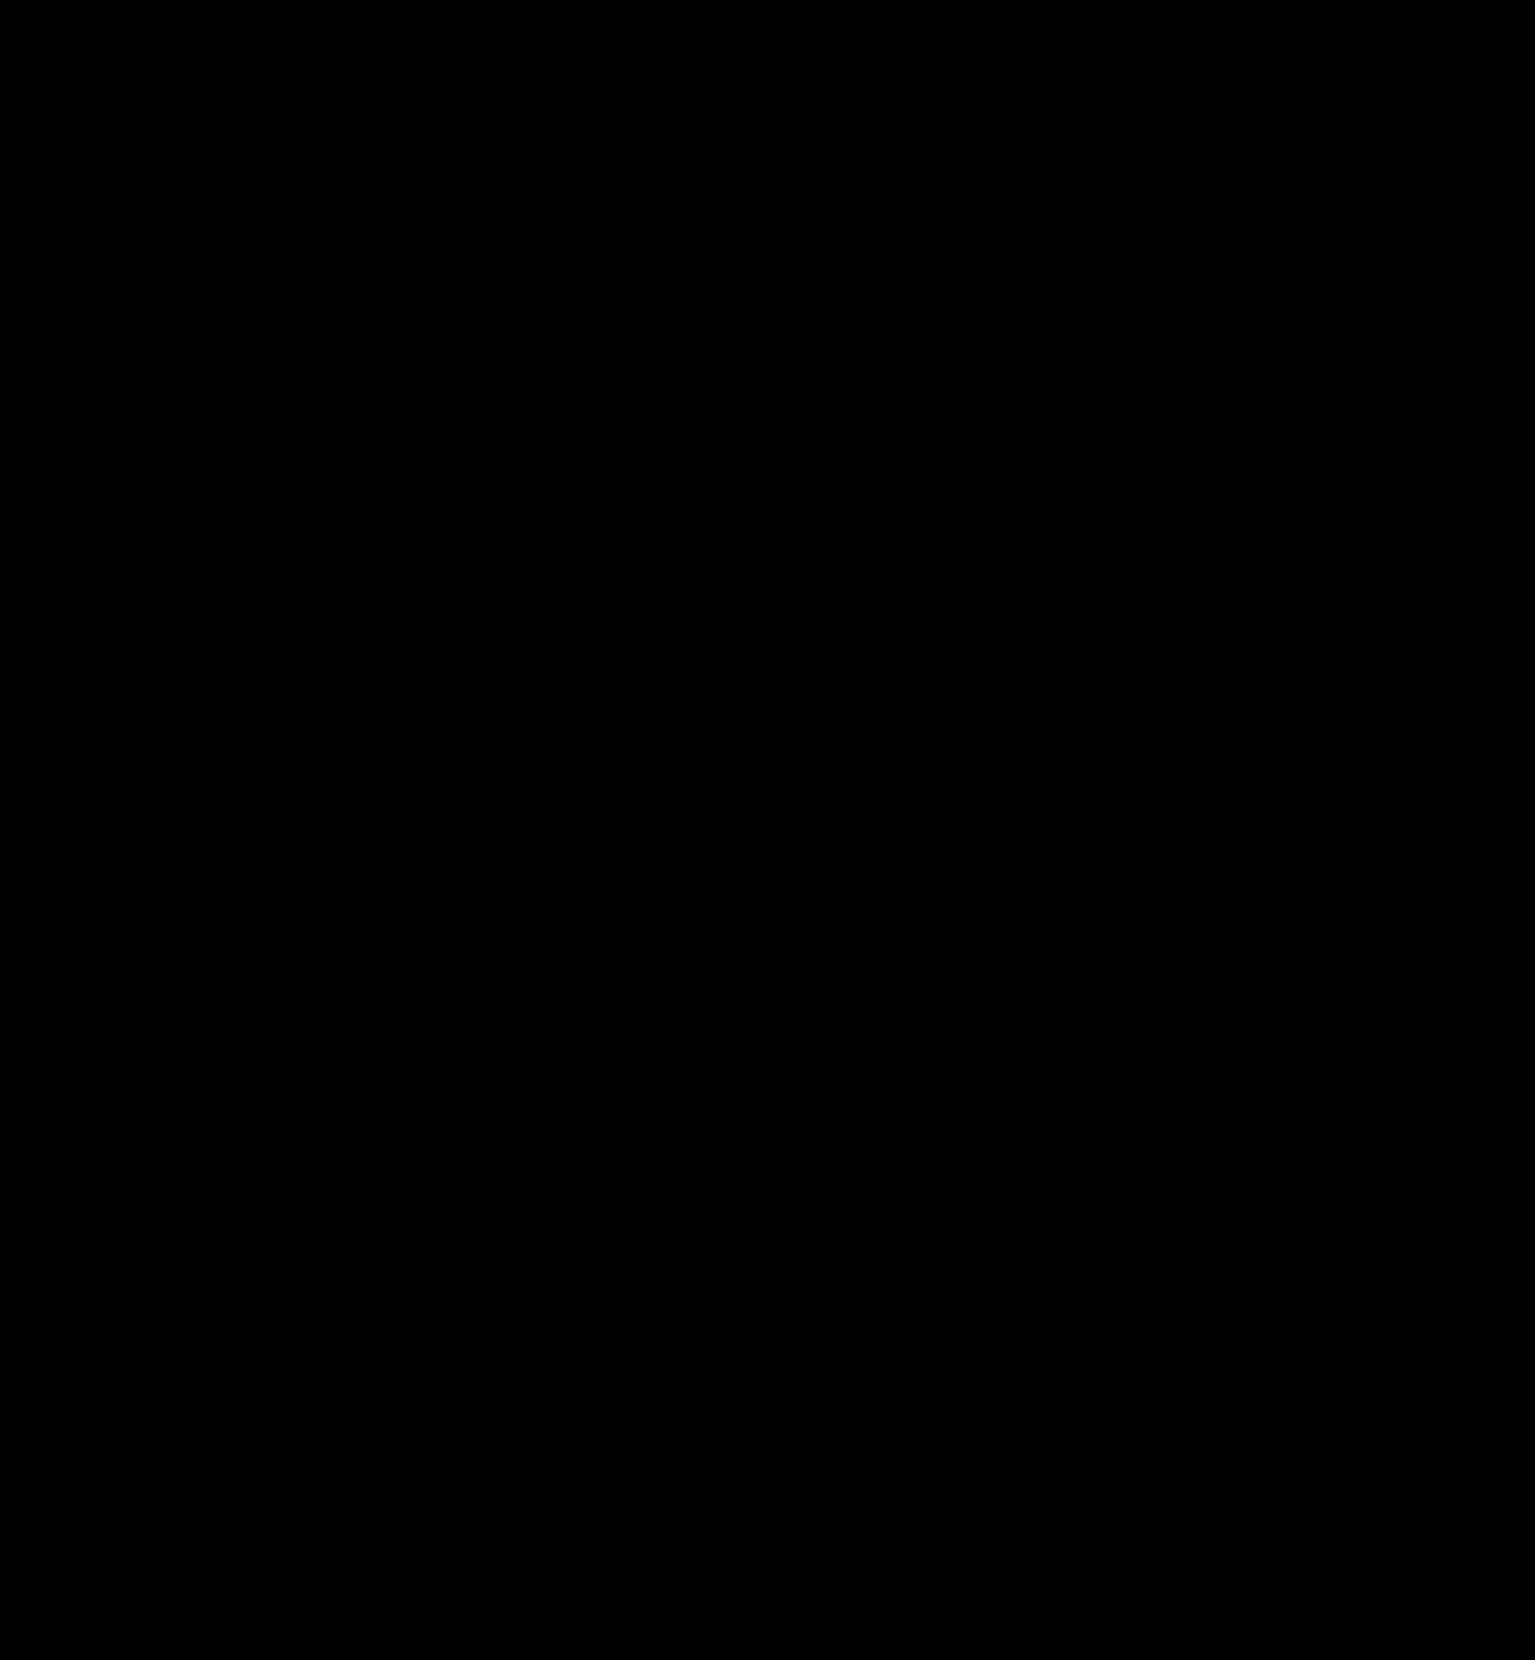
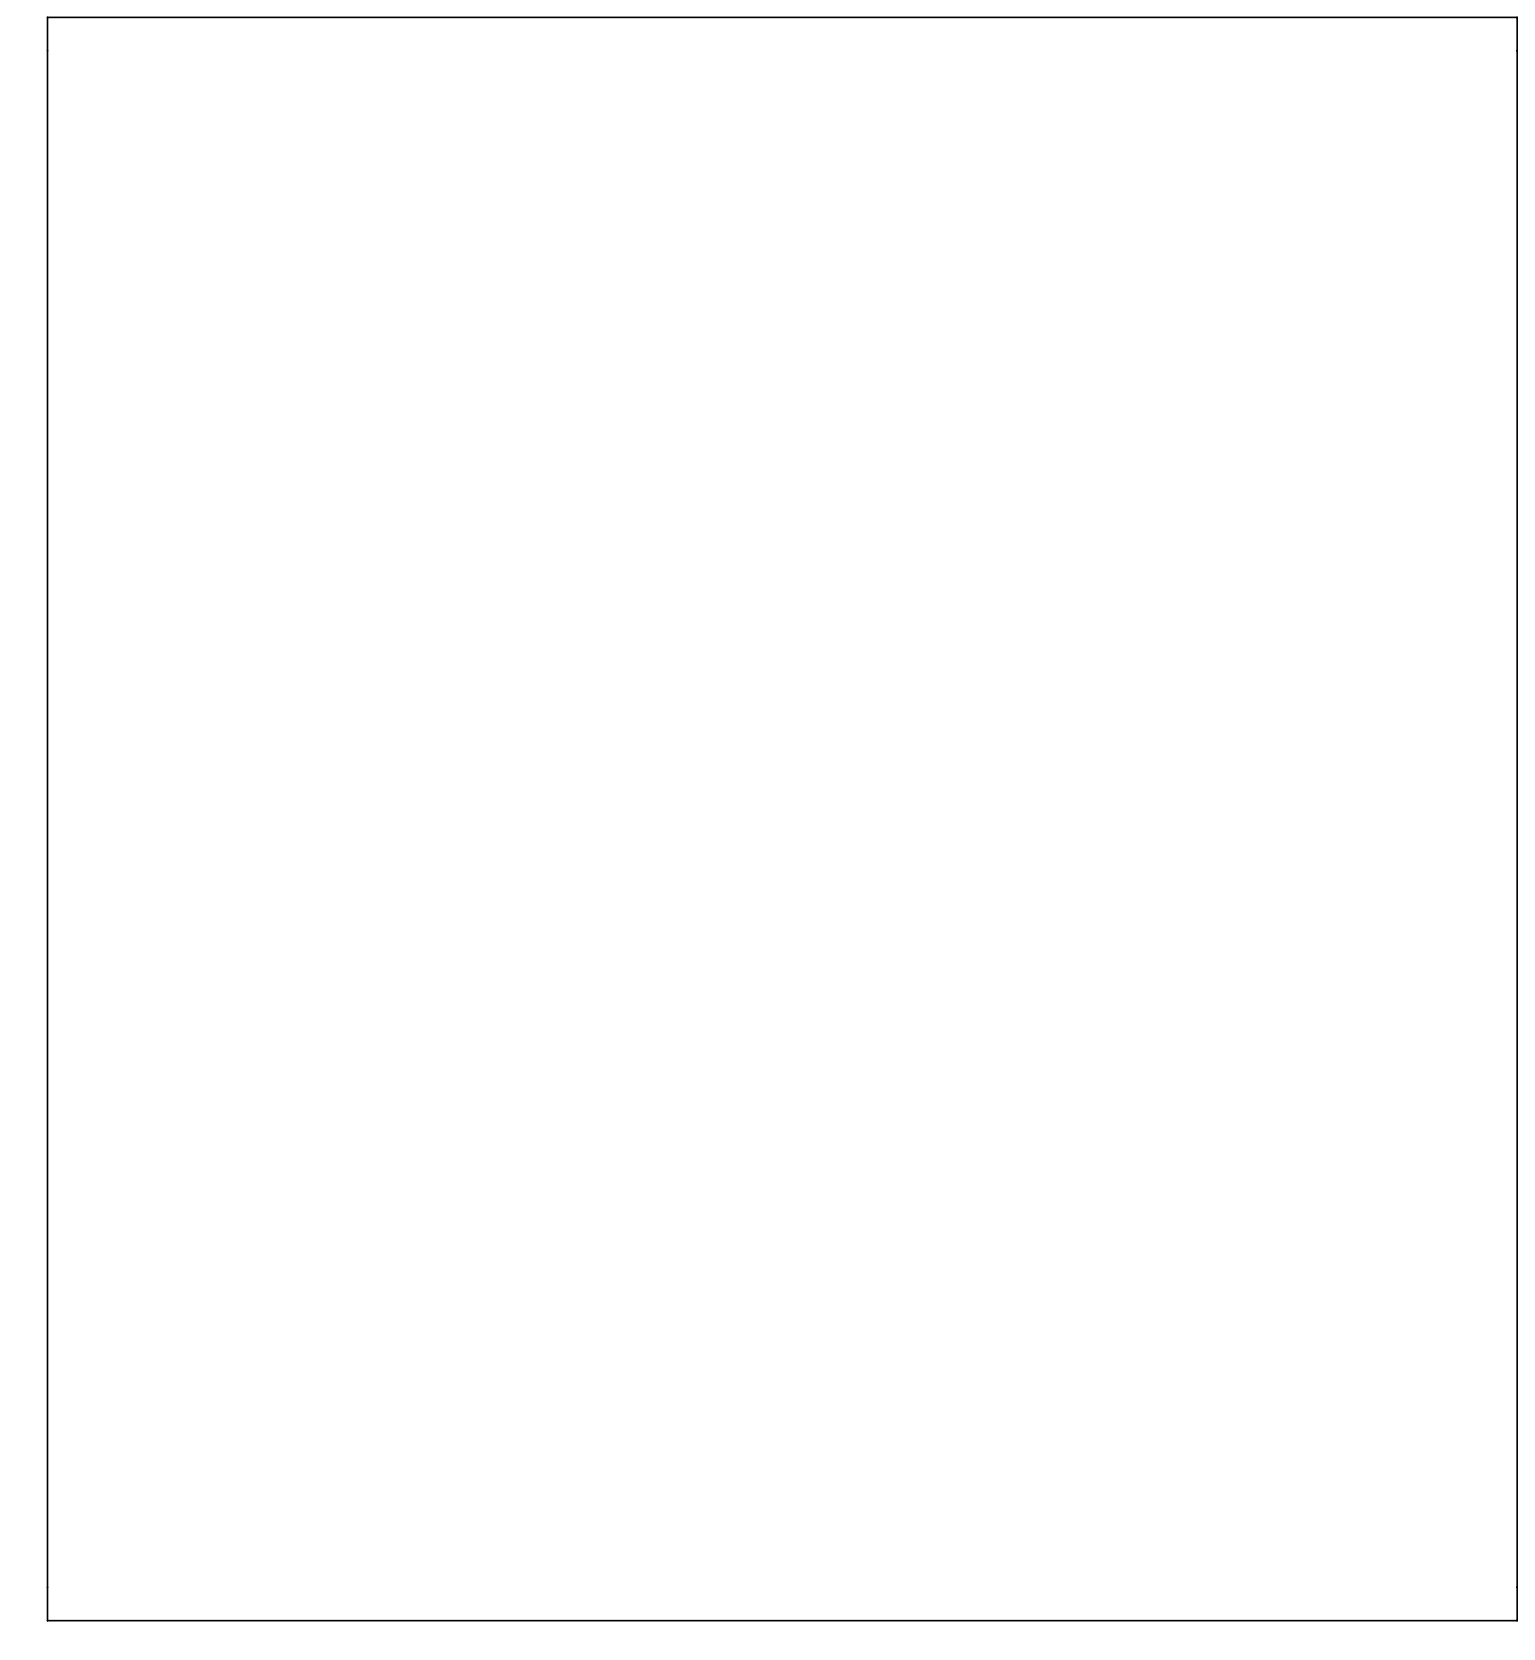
board edge: none -> (1517, 17) (1517, 1620) (47, 1620) (47, 17) (1517, 17)

